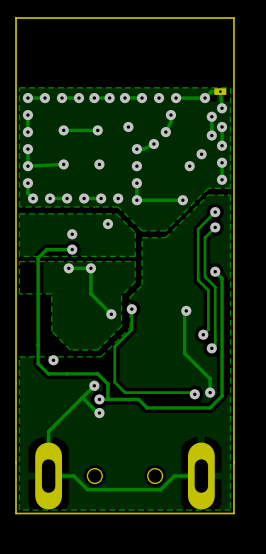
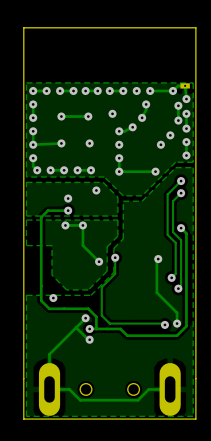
via: (118, 198) -> none

